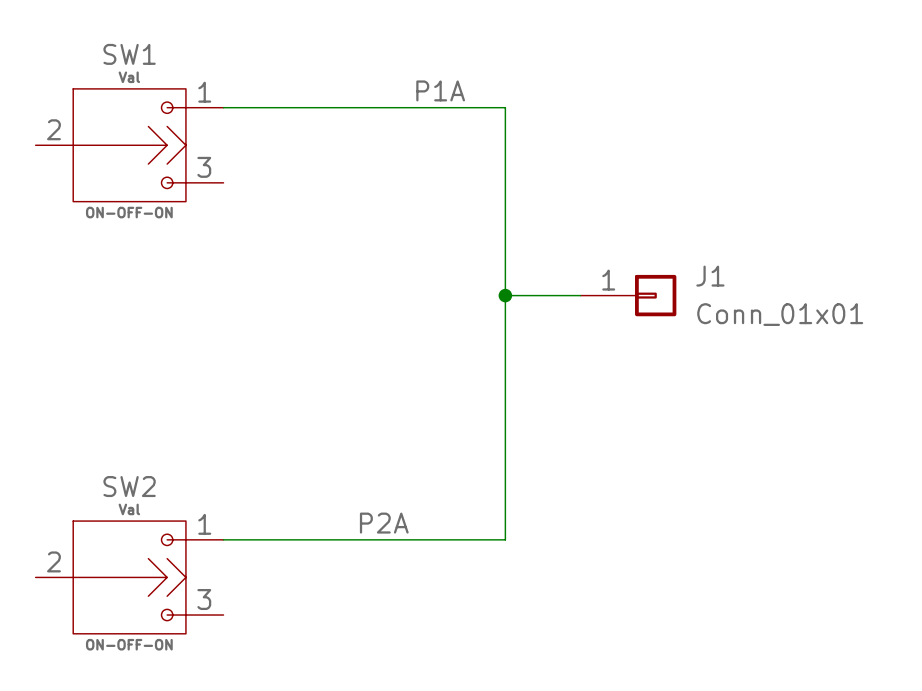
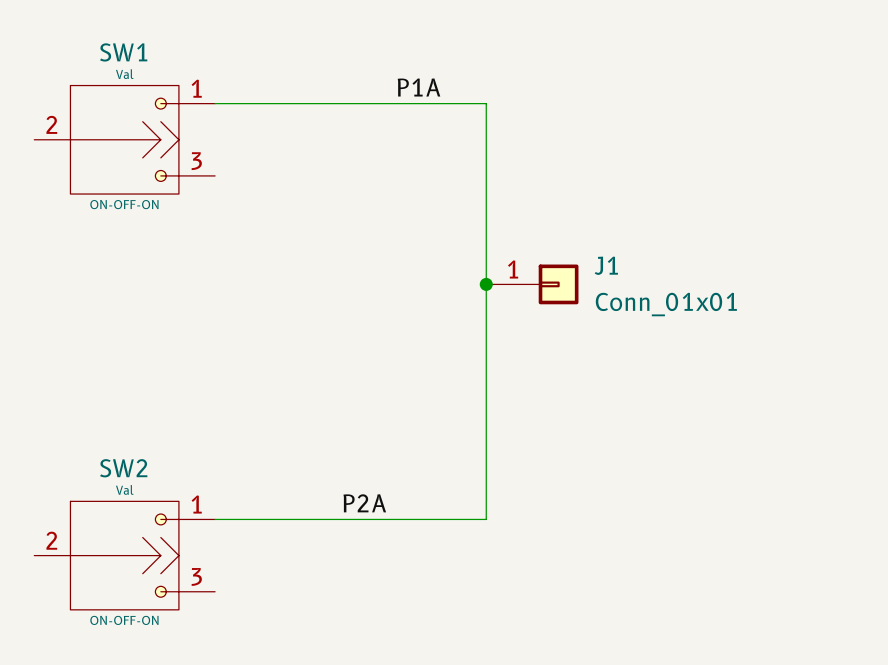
J1 position: (628, 295) -> (532, 284)

